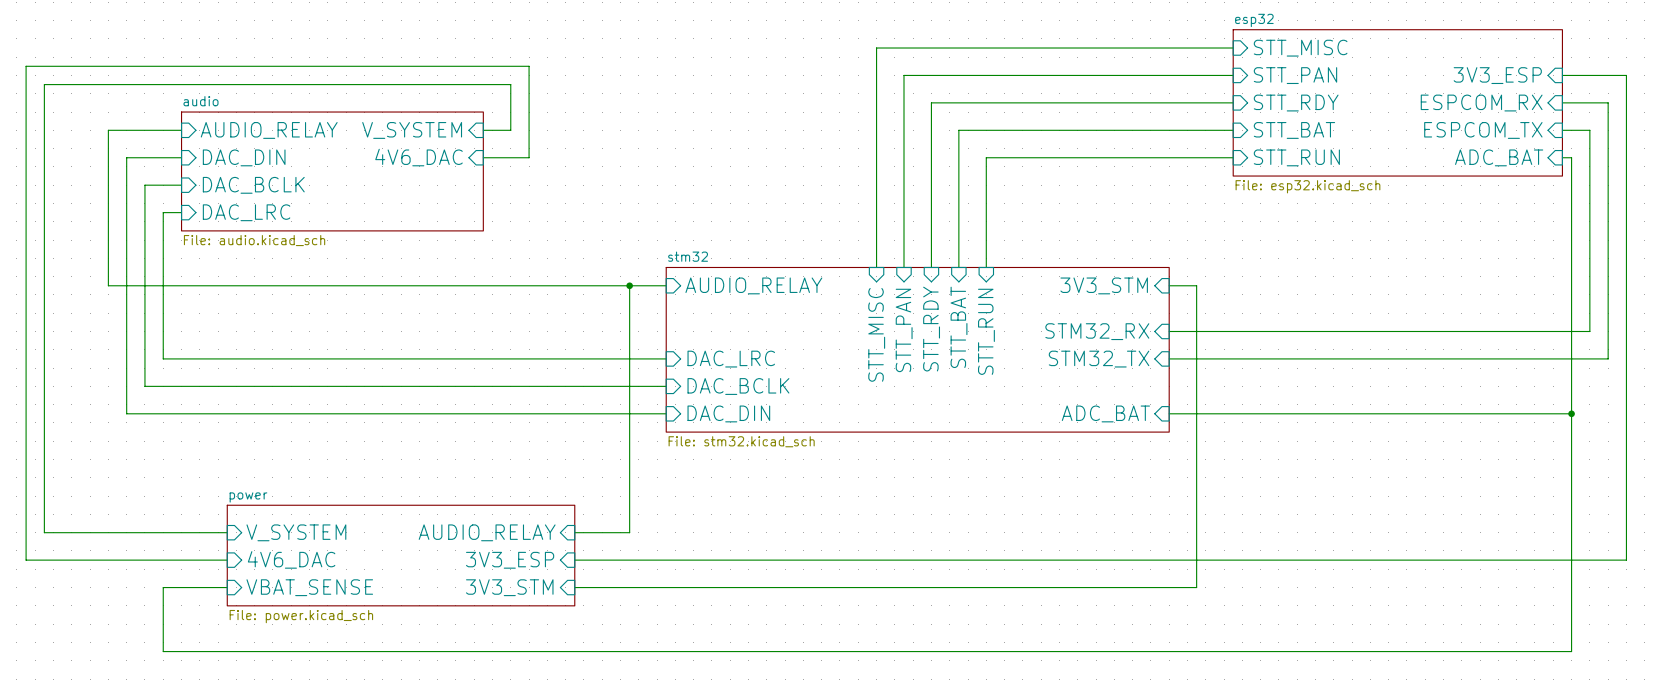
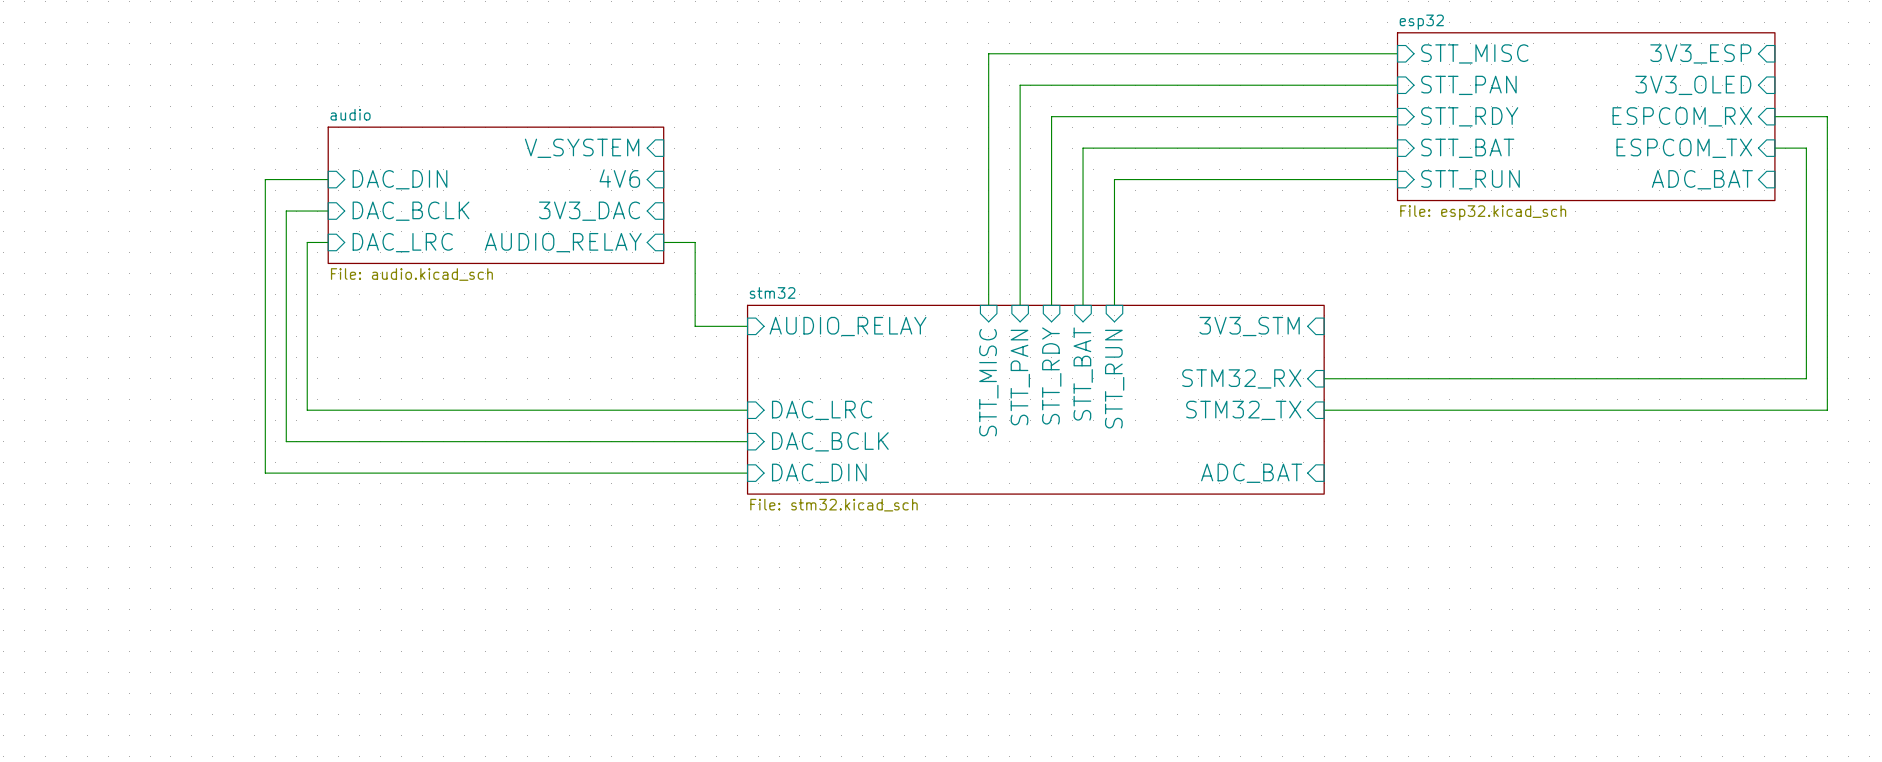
sheet pin: none -> 3V3_ESP (1700, 53)
sheet pin: 3V3_ESP (1497, 75) -> 3V3_OLED (1693, 85)
wire: (1562, 75) (1626, 75) (1626, 560) (574, 560) -> none
wire: (181, 130) (108, 130) (108, 285) (620, 285) -> (663, 242) (695, 242) (695, 326)
sheet pin: AUDIO_RELAY (269, 130) -> none
sheet pin position: V_SYSTEM (412, 130) -> V_SYSTEM (582, 148)
wire: (483, 130) (510, 130) (510, 84) (44, 84) (44, 532) (227, 532) -> none
sheet pin: none -> 4V6 (619, 178)
wire: (181, 157) (126, 157) (126, 413) (245, 413) -> (328, 179) (265, 179) (265, 473)
sheet pin position: DAC_DIN (244, 157) -> DAC_DIN (399, 179)
sheet pin: 4V6_DAC (419, 157) -> none
wire: (483, 157) (529, 157) (529, 66) (26, 66) (26, 560) (227, 560) -> none
wire: (1562, 157) (1571, 157) (1571, 651) (163, 651) (163, 587) (227, 587) -> none
sheet audio: File: audio.kicad_sch (332, 171) -> none
sheet audio: none -> File: audio.kicad_sch (495, 195)
wire: (181, 185) (144, 185) (144, 386) (263, 386) -> (328, 211) (286, 211) (286, 441)
sheet pin position: DAC_BCLK (253, 185) -> DAC_BCLK (411, 211)
sheet pin: none -> 3V3_DAC (589, 211)
wire: (181, 212) (163, 212) (163, 358) (282, 358) -> (328, 242) (307, 242) (307, 410)
sheet pin position: DAC_LRC (246, 212) -> DAC_LRC (402, 242)
sheet pin: none -> AUDIO_RELAY (563, 242)
wire: (629, 285) (629, 532) (574, 532) -> none
junction: (629, 285) -> none
wire: (1169, 285) (1196, 285) (1196, 587) (574, 587) -> none
wire: (1169, 413) (1571, 413) -> none
junction: (1571, 413) -> none
sheet pin: V_SYSTEM (296, 532) -> none
sheet pin: AUDIO_RELAY (487, 532) -> none
sheet power: File: power.kicad_sch (401, 555) -> none
sheet pin: 4V6_DAC (291, 559) -> none
sheet pin: 3V3_ESP (510, 560) -> none
sheet pin: VBAT_SENSE (309, 587) -> none
sheet pin: 3V3_STM (509, 587) -> none

